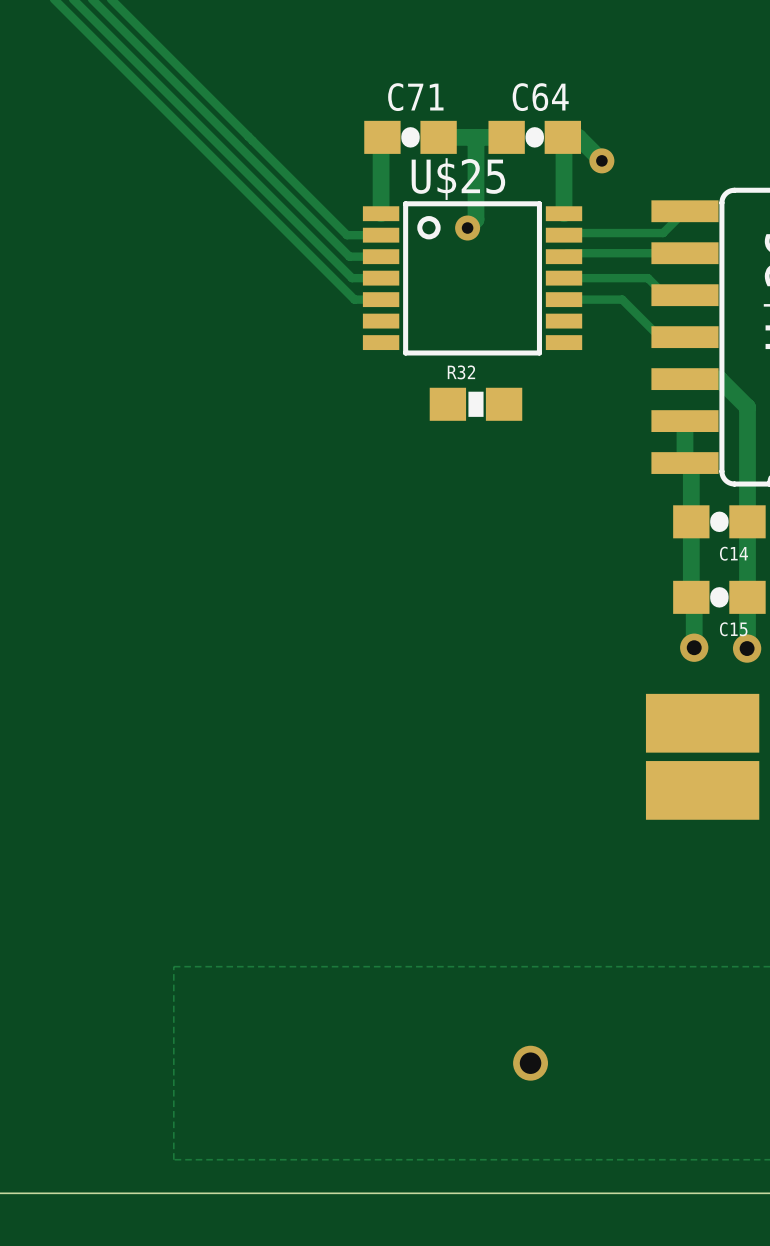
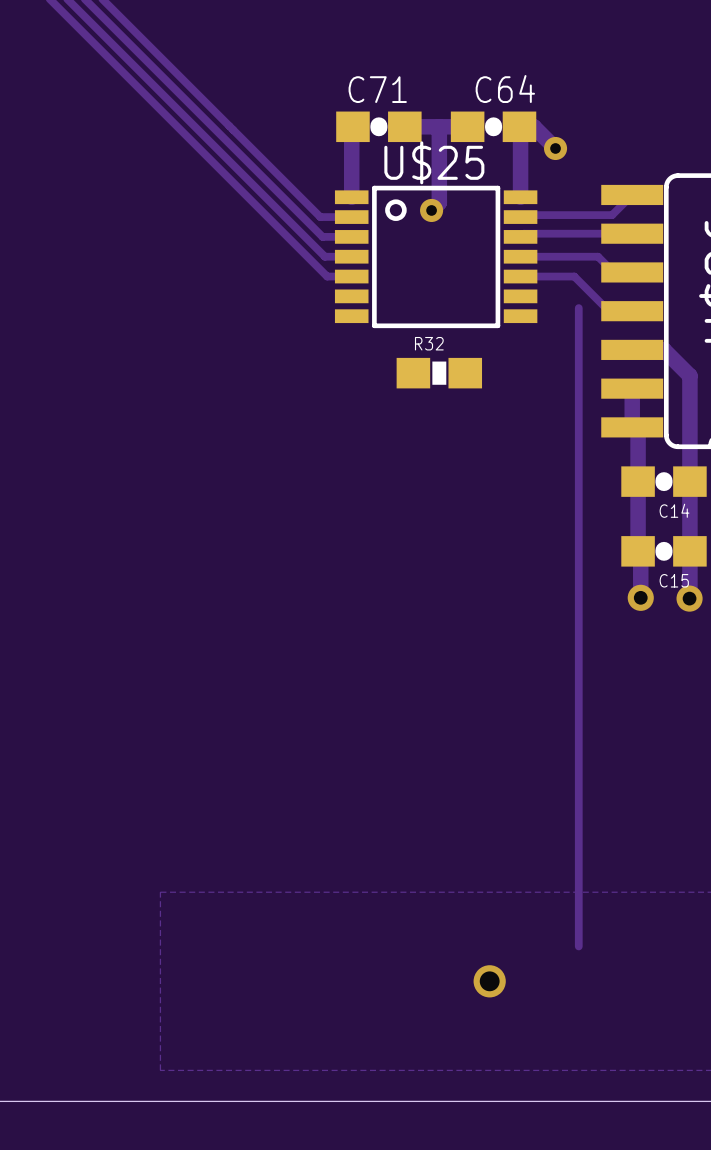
track: none -> (578, 308) (578, 946)
part: (702, 723) -> none
part: (702, 790) -> none

